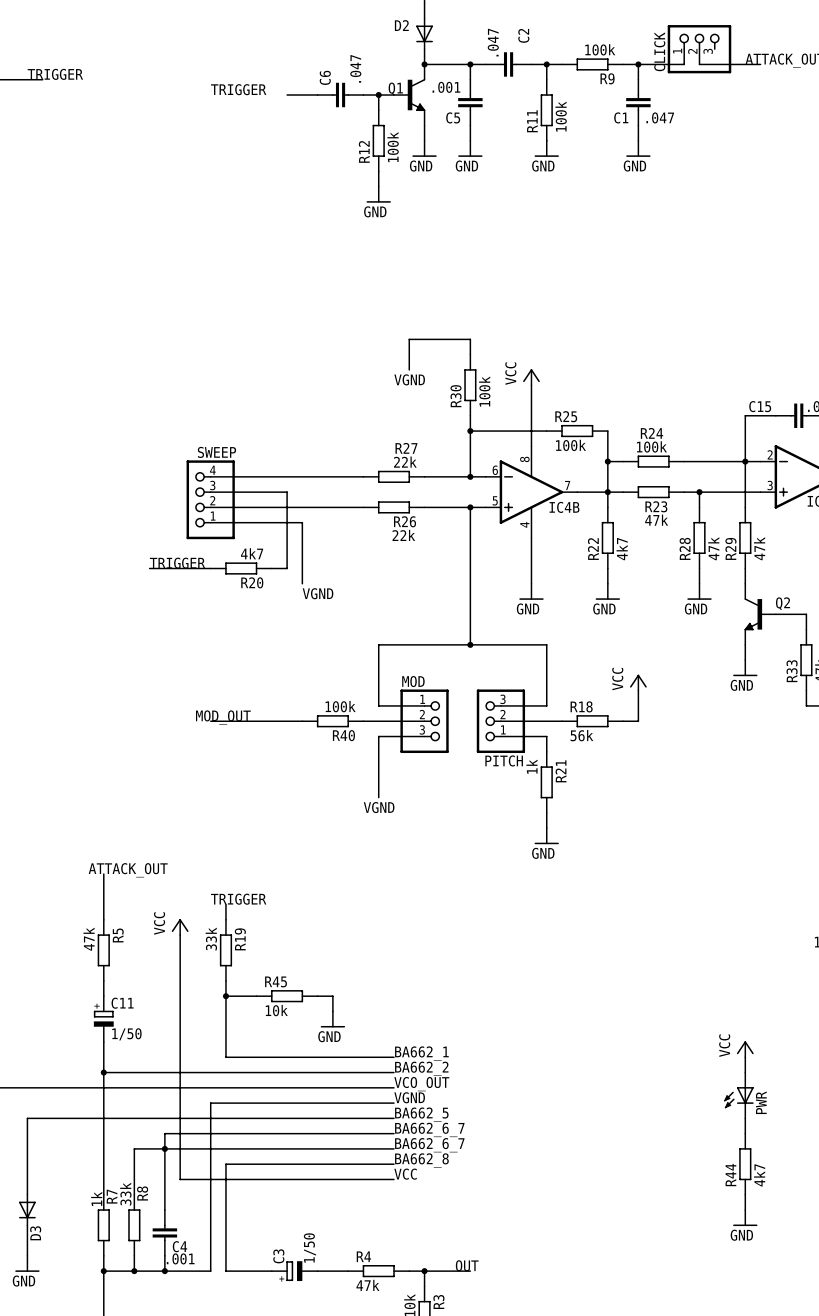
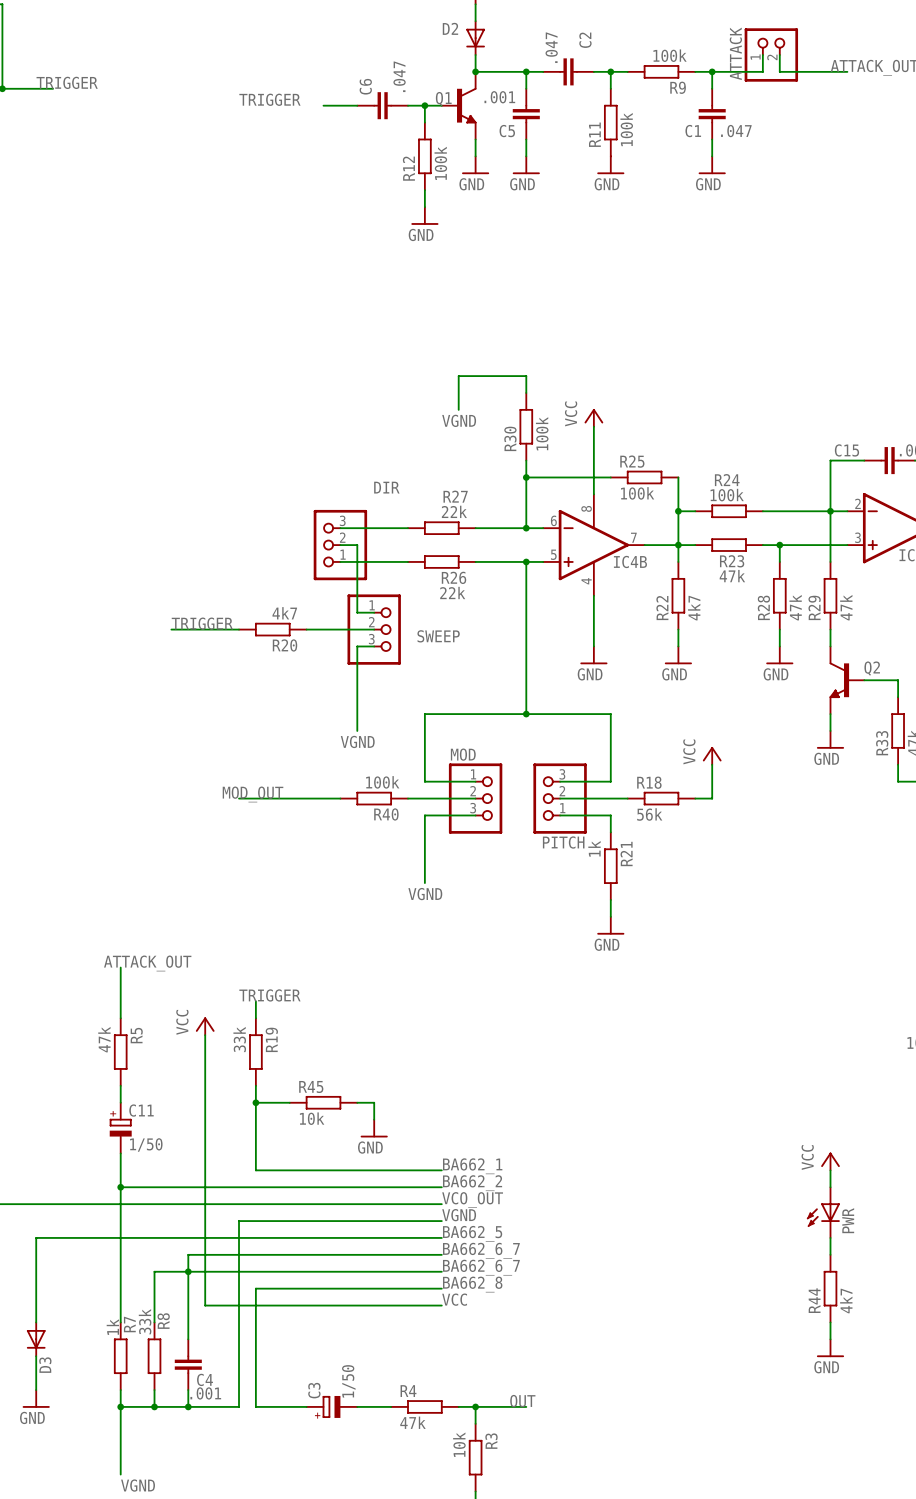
ATTACK: none -> (771, 54)
CLICK: (699, 49) -> none
wire: (210, 476) (302, 476) -> none
wire: (210, 492) (287, 492) (287, 568) -> (374, 629) (323, 629)
wire: none -> (340, 545) (357, 545) (357, 612) (374, 612)
DIR: none -> (340, 545)
SWEEP: (210, 499) -> none
wire: (210, 507) (302, 507) -> none
wire: (210, 522) (302, 522) (302, 583) -> none
SWEEP: none -> (374, 629)
wire: none -> (374, 646) (357, 646) (357, 730)
label position: VGND (318, 593) -> VGND (357, 741)

